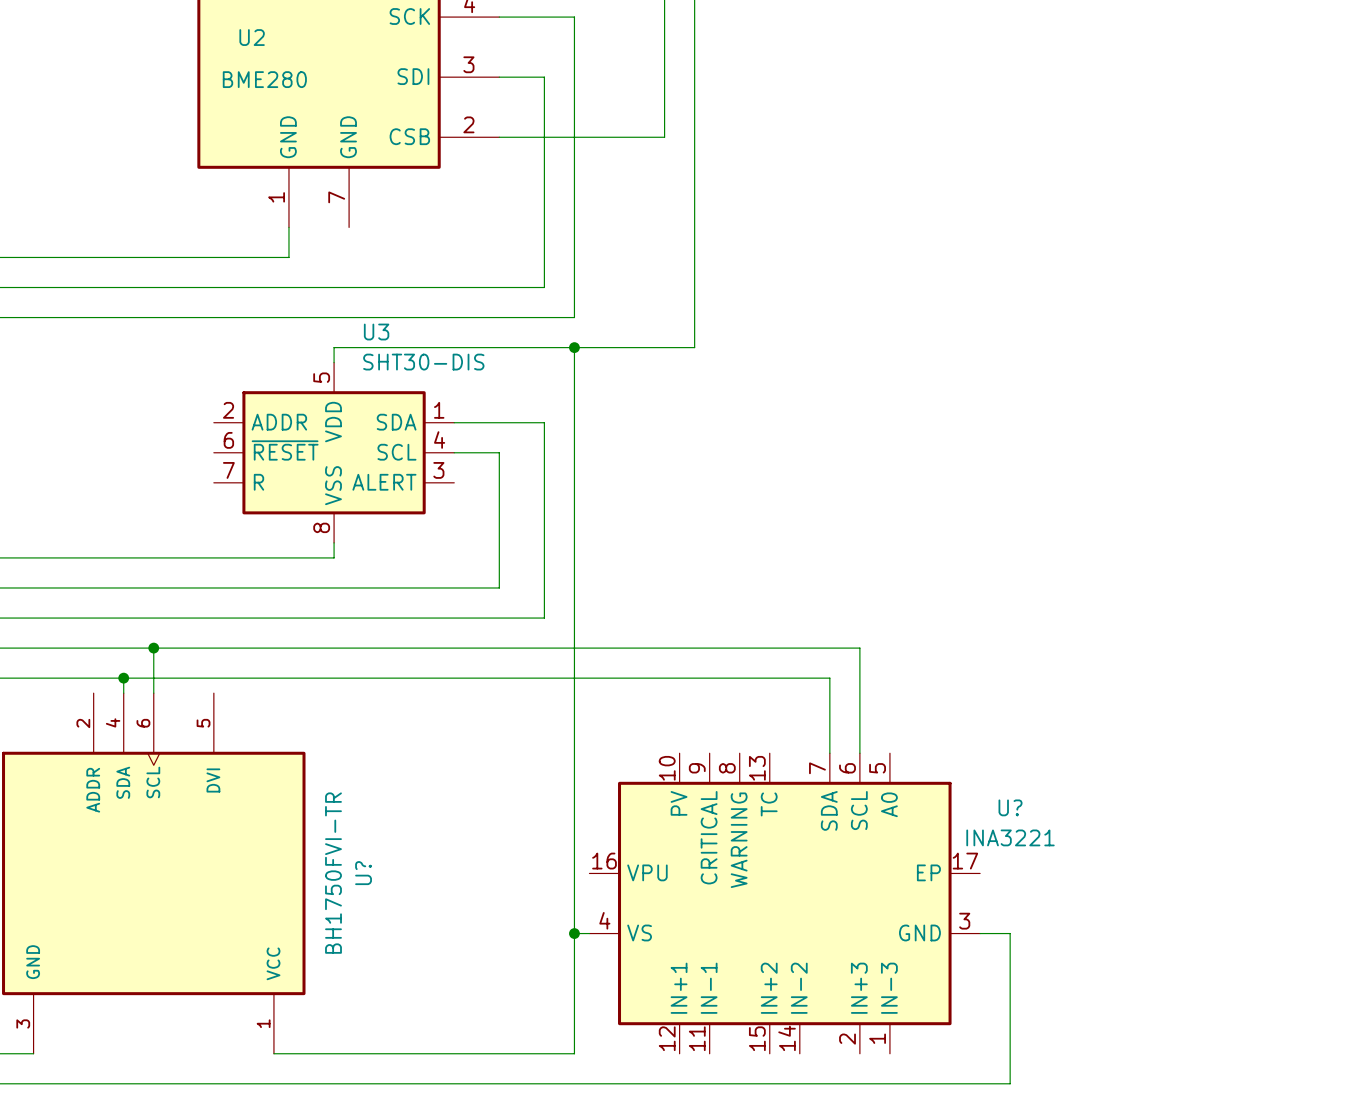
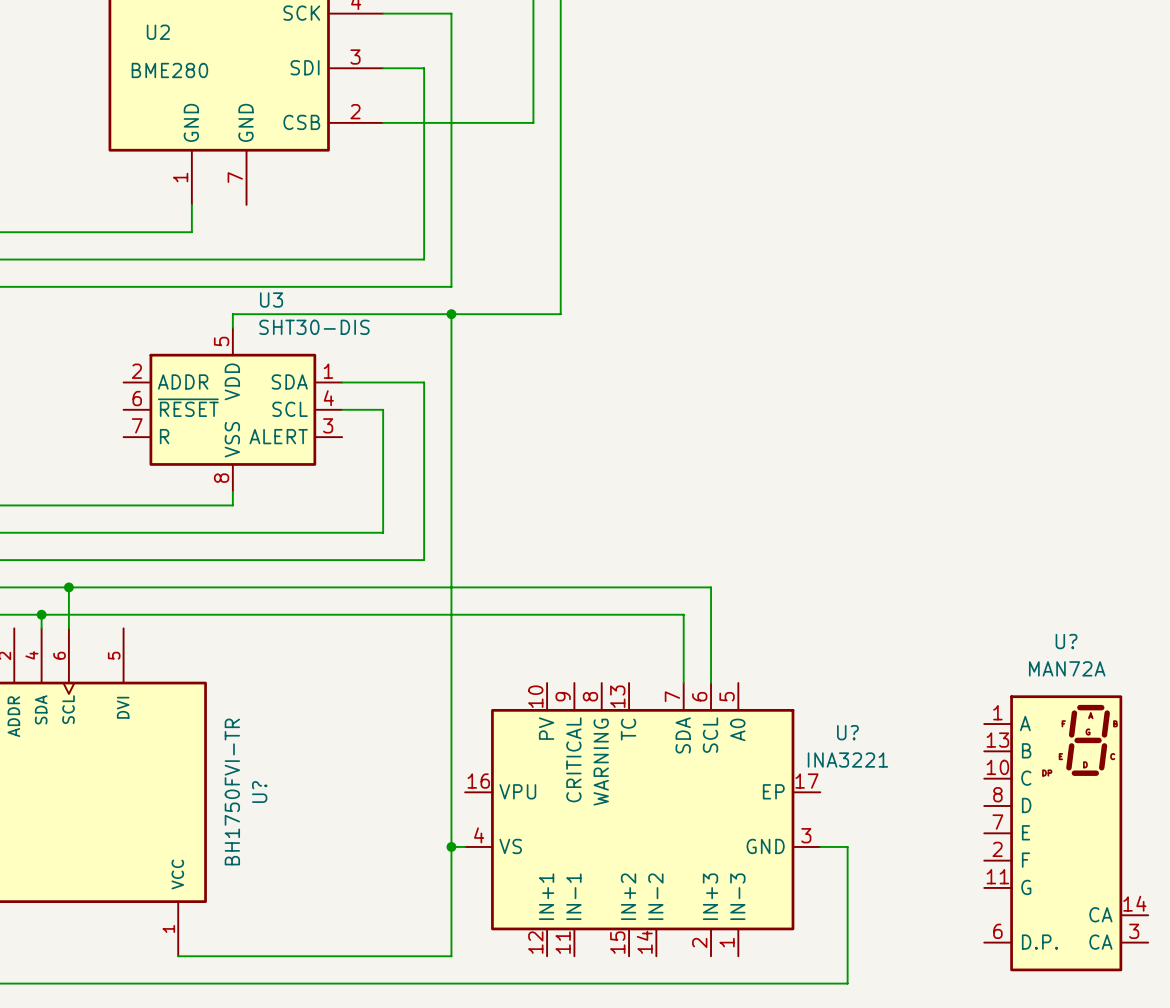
U?: none -> MAN72A (1066, 833)

